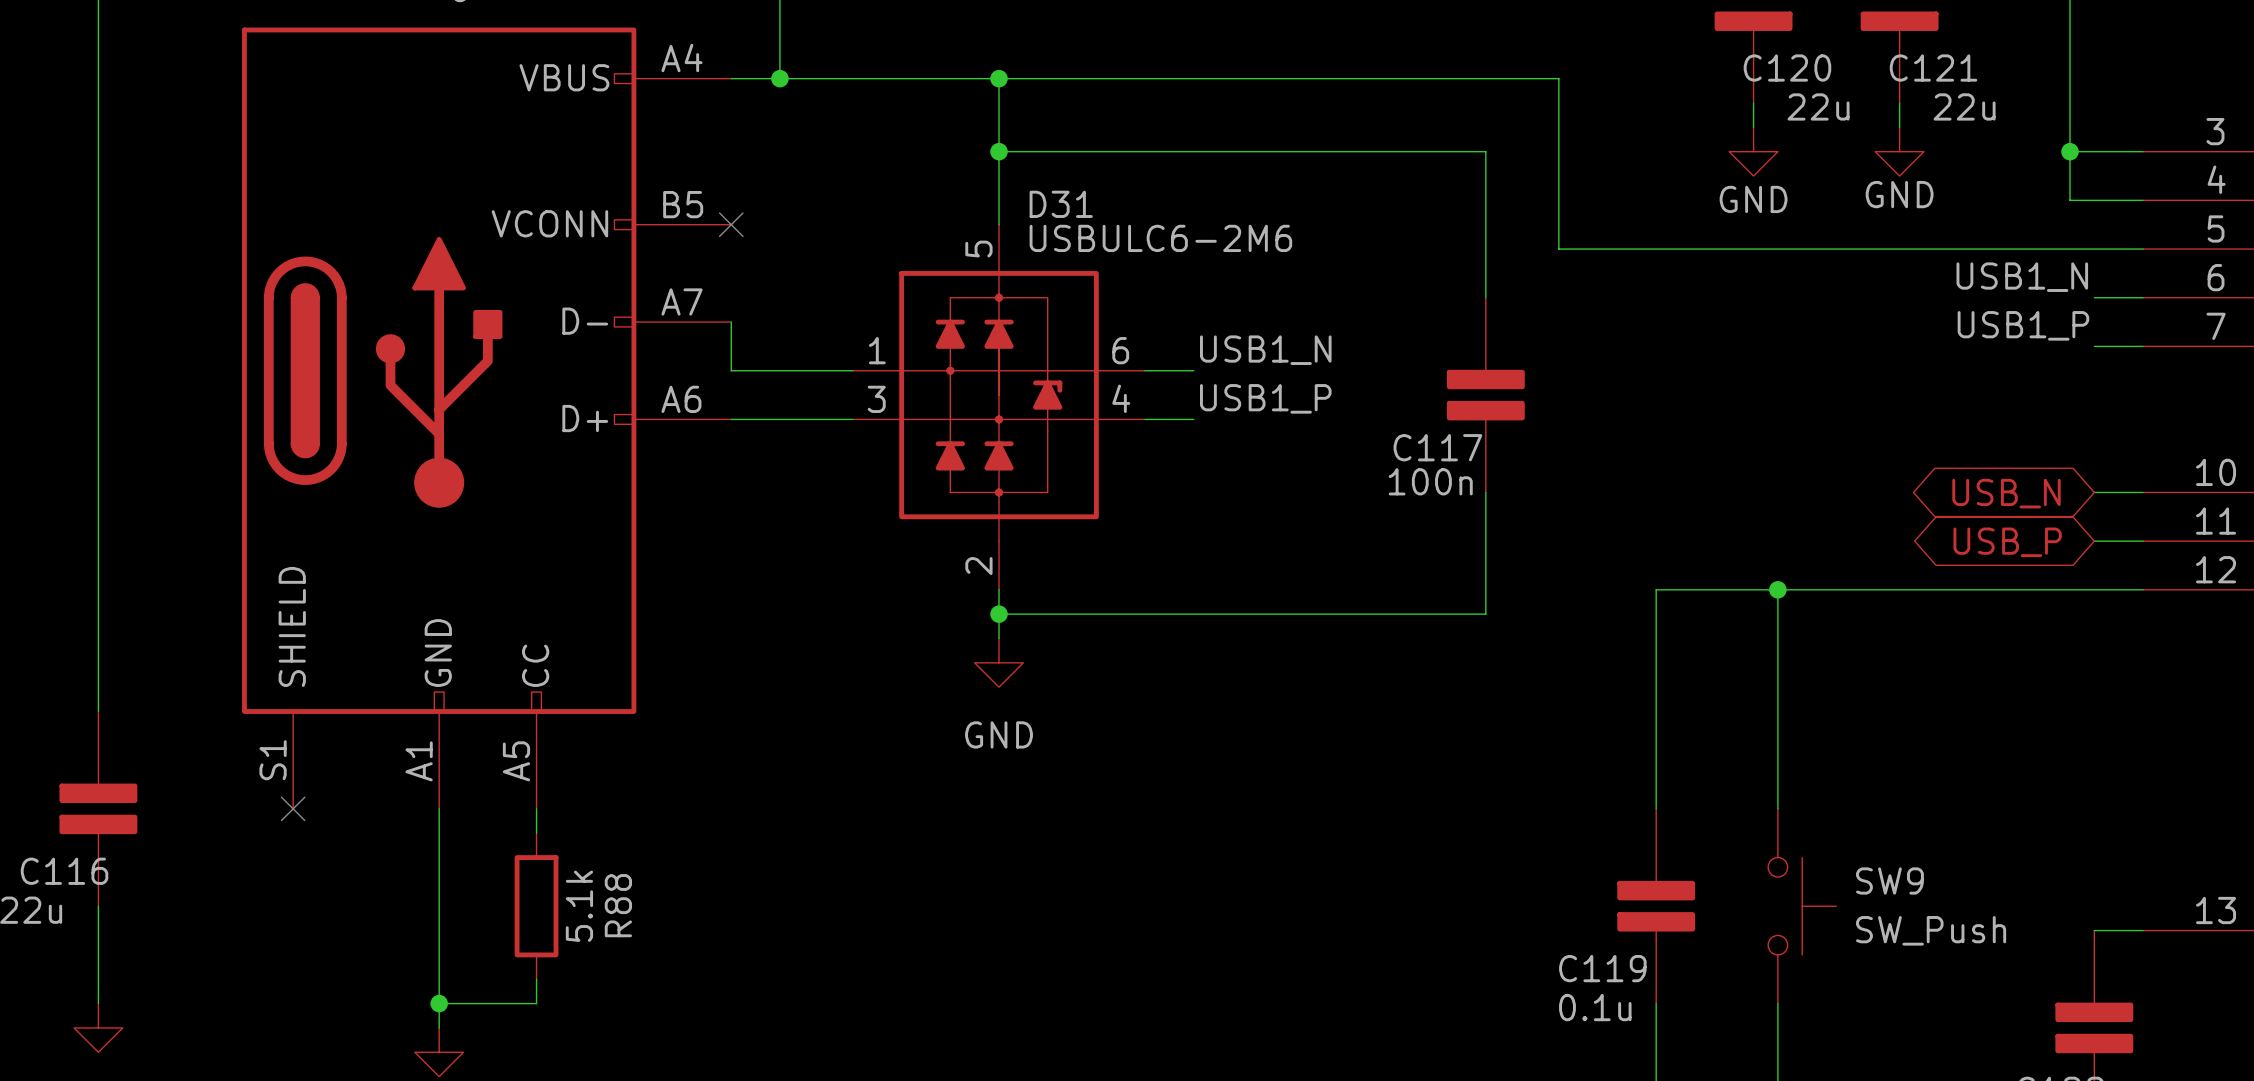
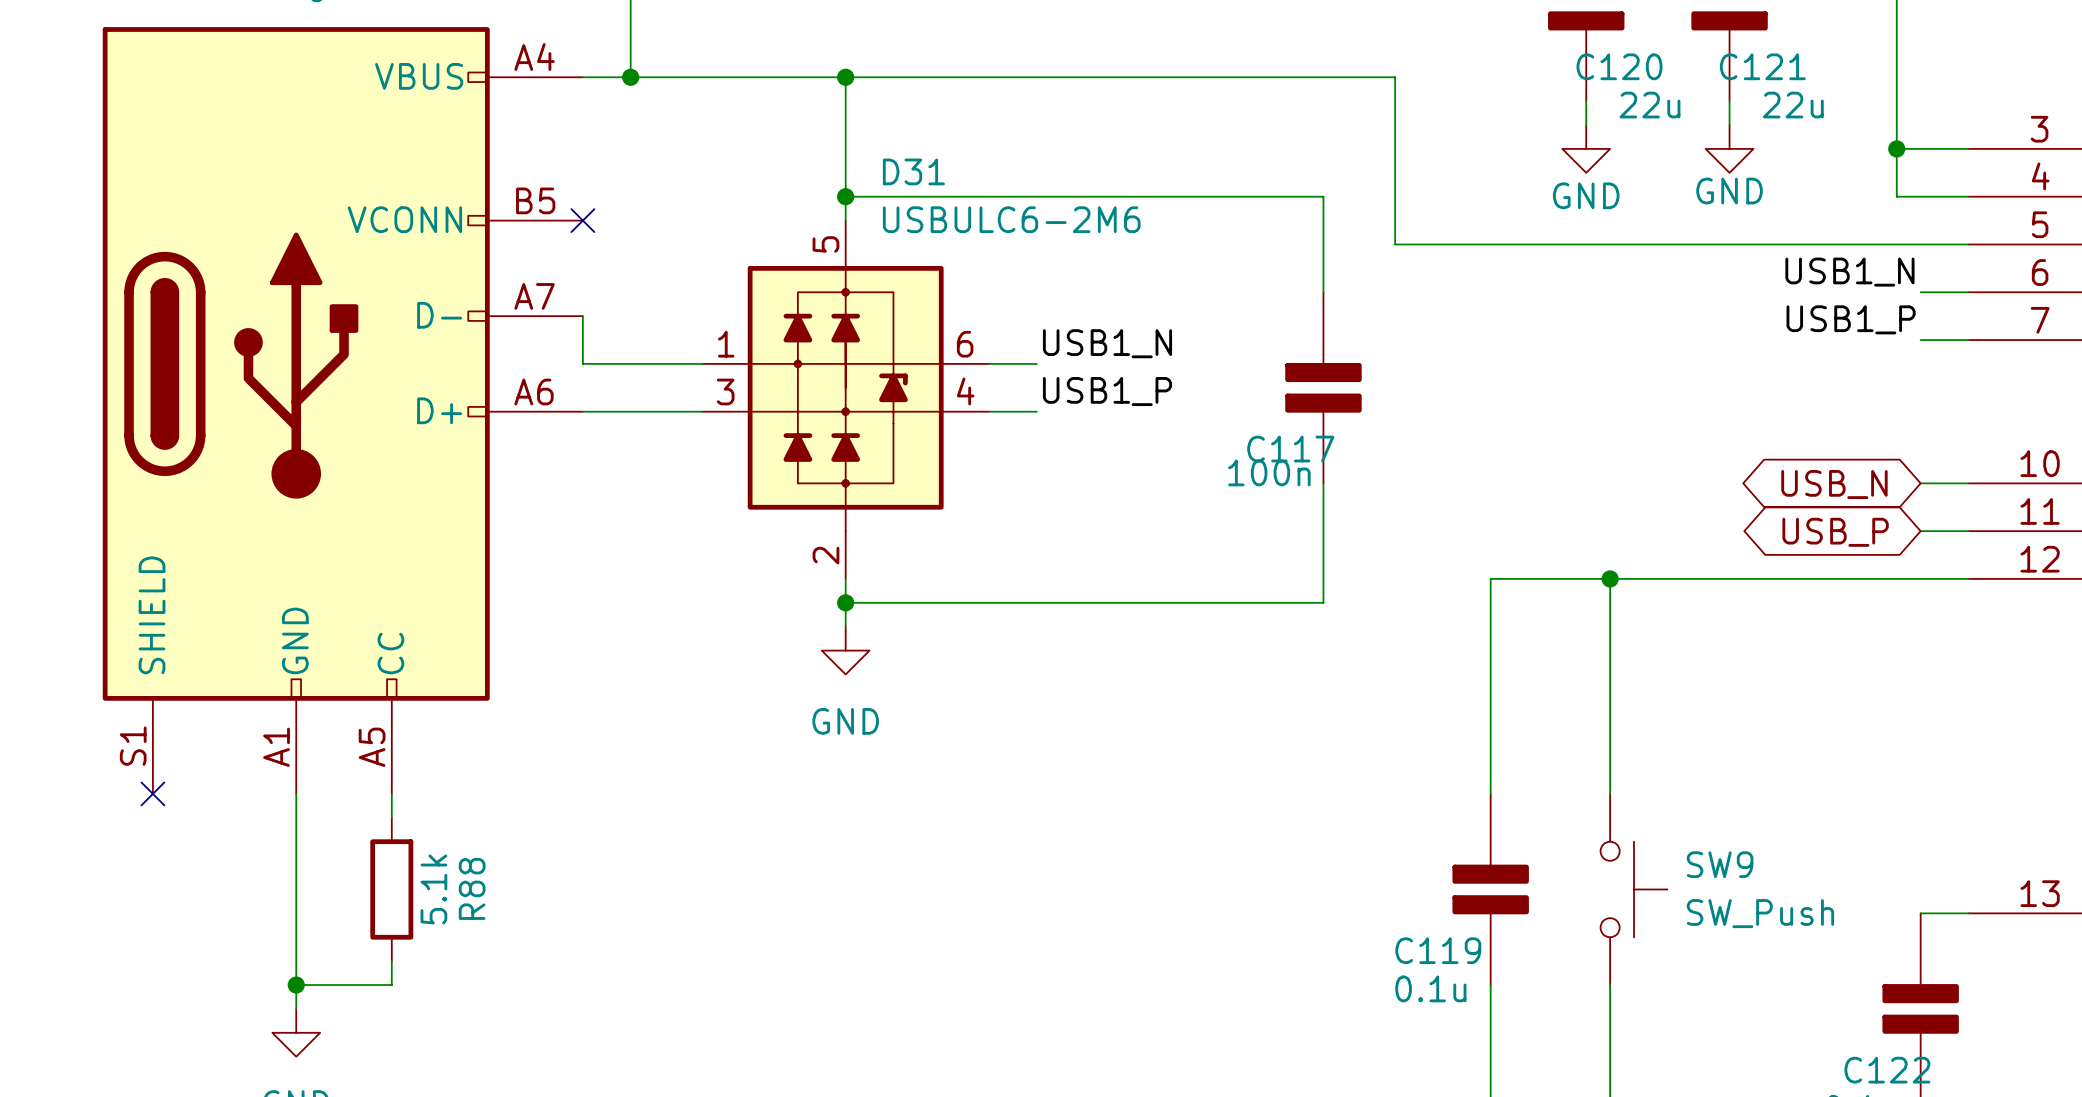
wire: (999, 151) (1485, 151) (1485, 200) -> (845, 196) (1323, 196)
junction position: (999, 151) -> (845, 196)
D31 name position: D31 (1061, 204) -> D31 (913, 171)
D31 value position: USBULC6-2M6 (1160, 238) -> USBULC6-2M6 (1011, 219)
C117 name position: C117 (1437, 447) -> C117 (1290, 449)

